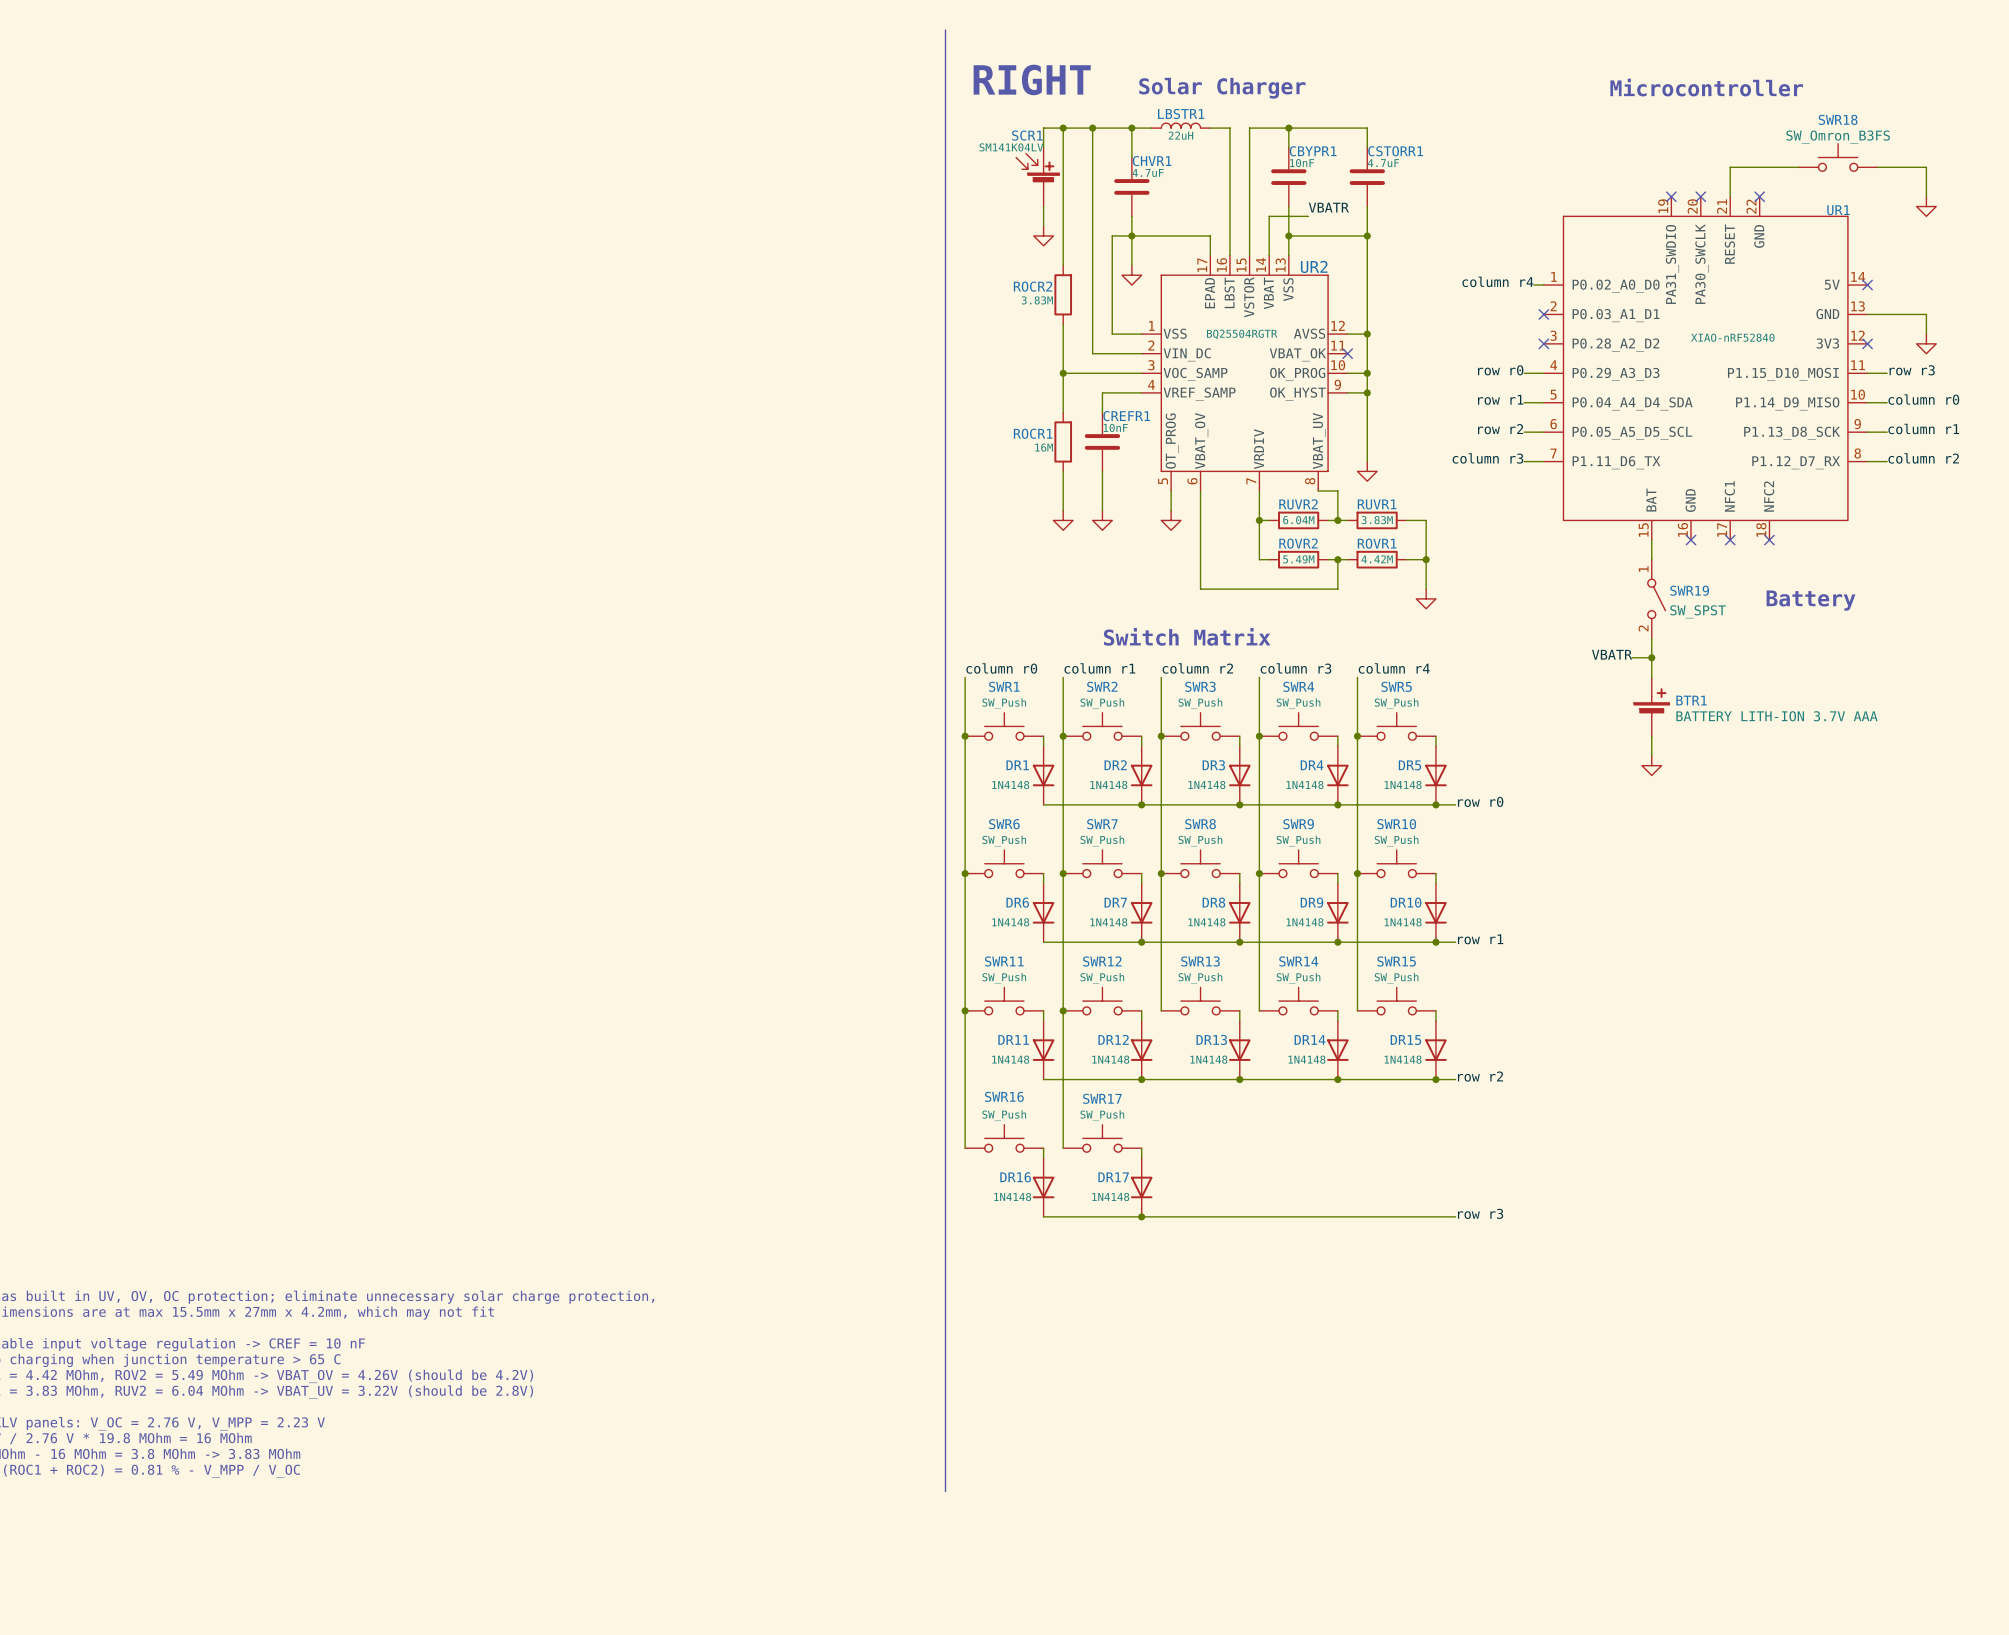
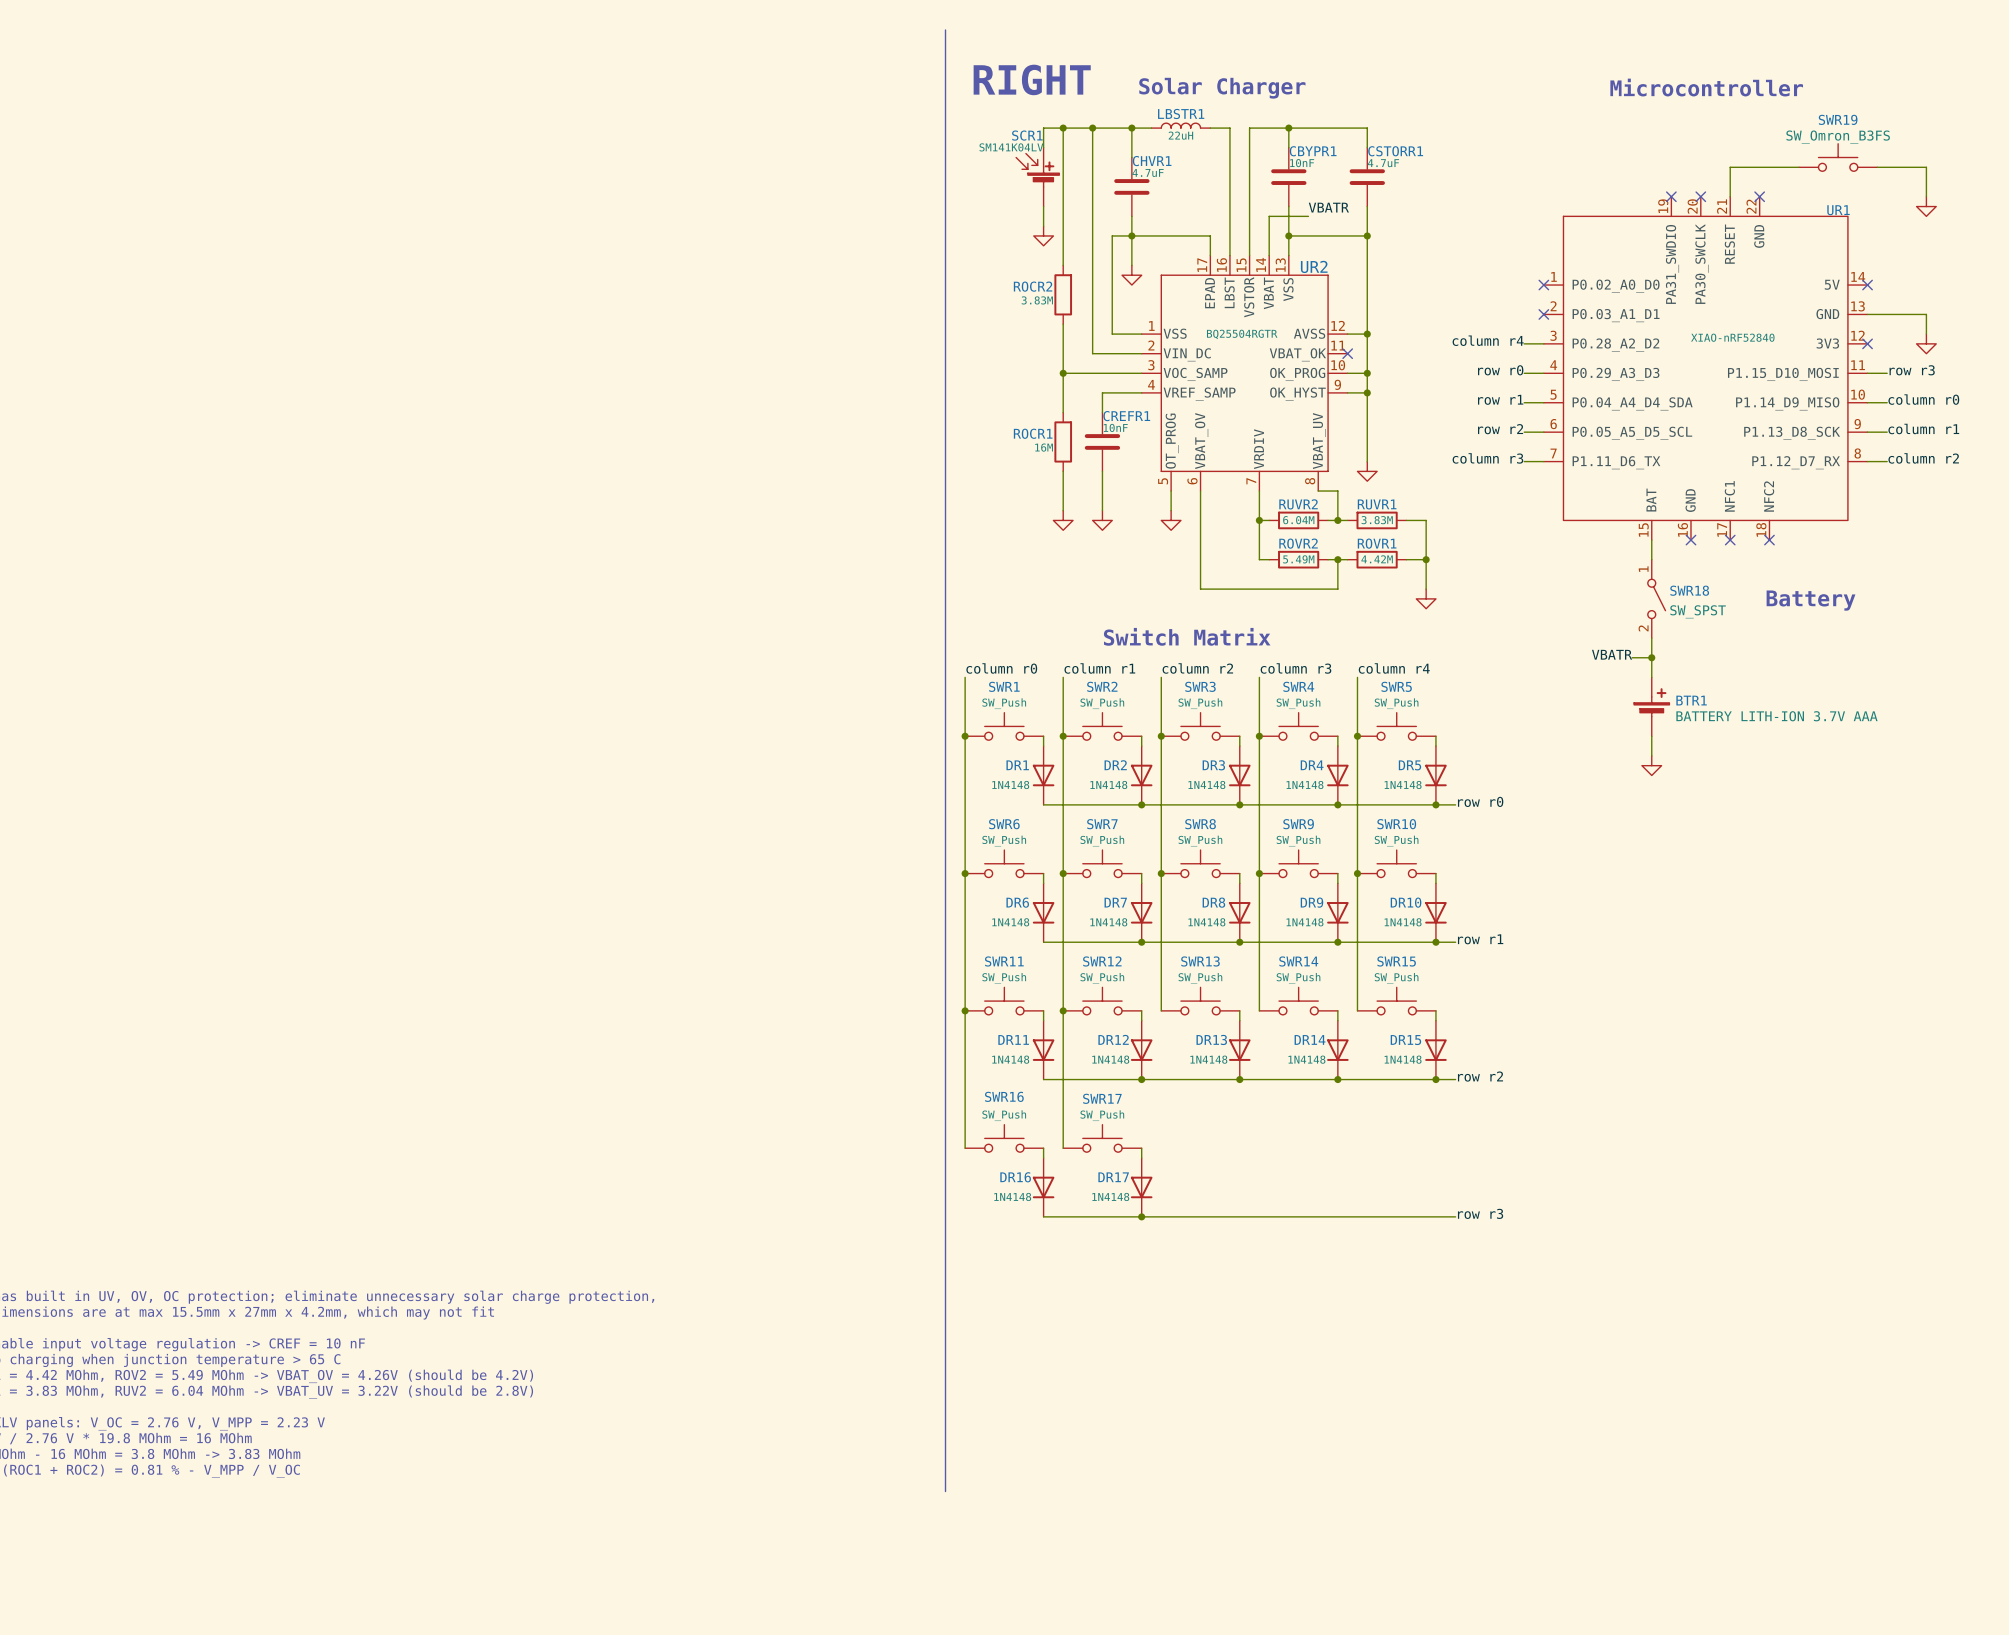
SWR18 name: SWR18 (1838, 119) -> SWR19 (1838, 119)
label position: column r4 (1497, 281) -> column r4 (1488, 340)
wire: (1534, 285) (1543, 285) -> none
no-connect mark: none -> (1543, 285)
wire: none -> (1524, 343) (1543, 343)
no-connect mark: (1543, 343) -> none
SWR19 name: SWR19 (1689, 590) -> SWR18 (1689, 590)

